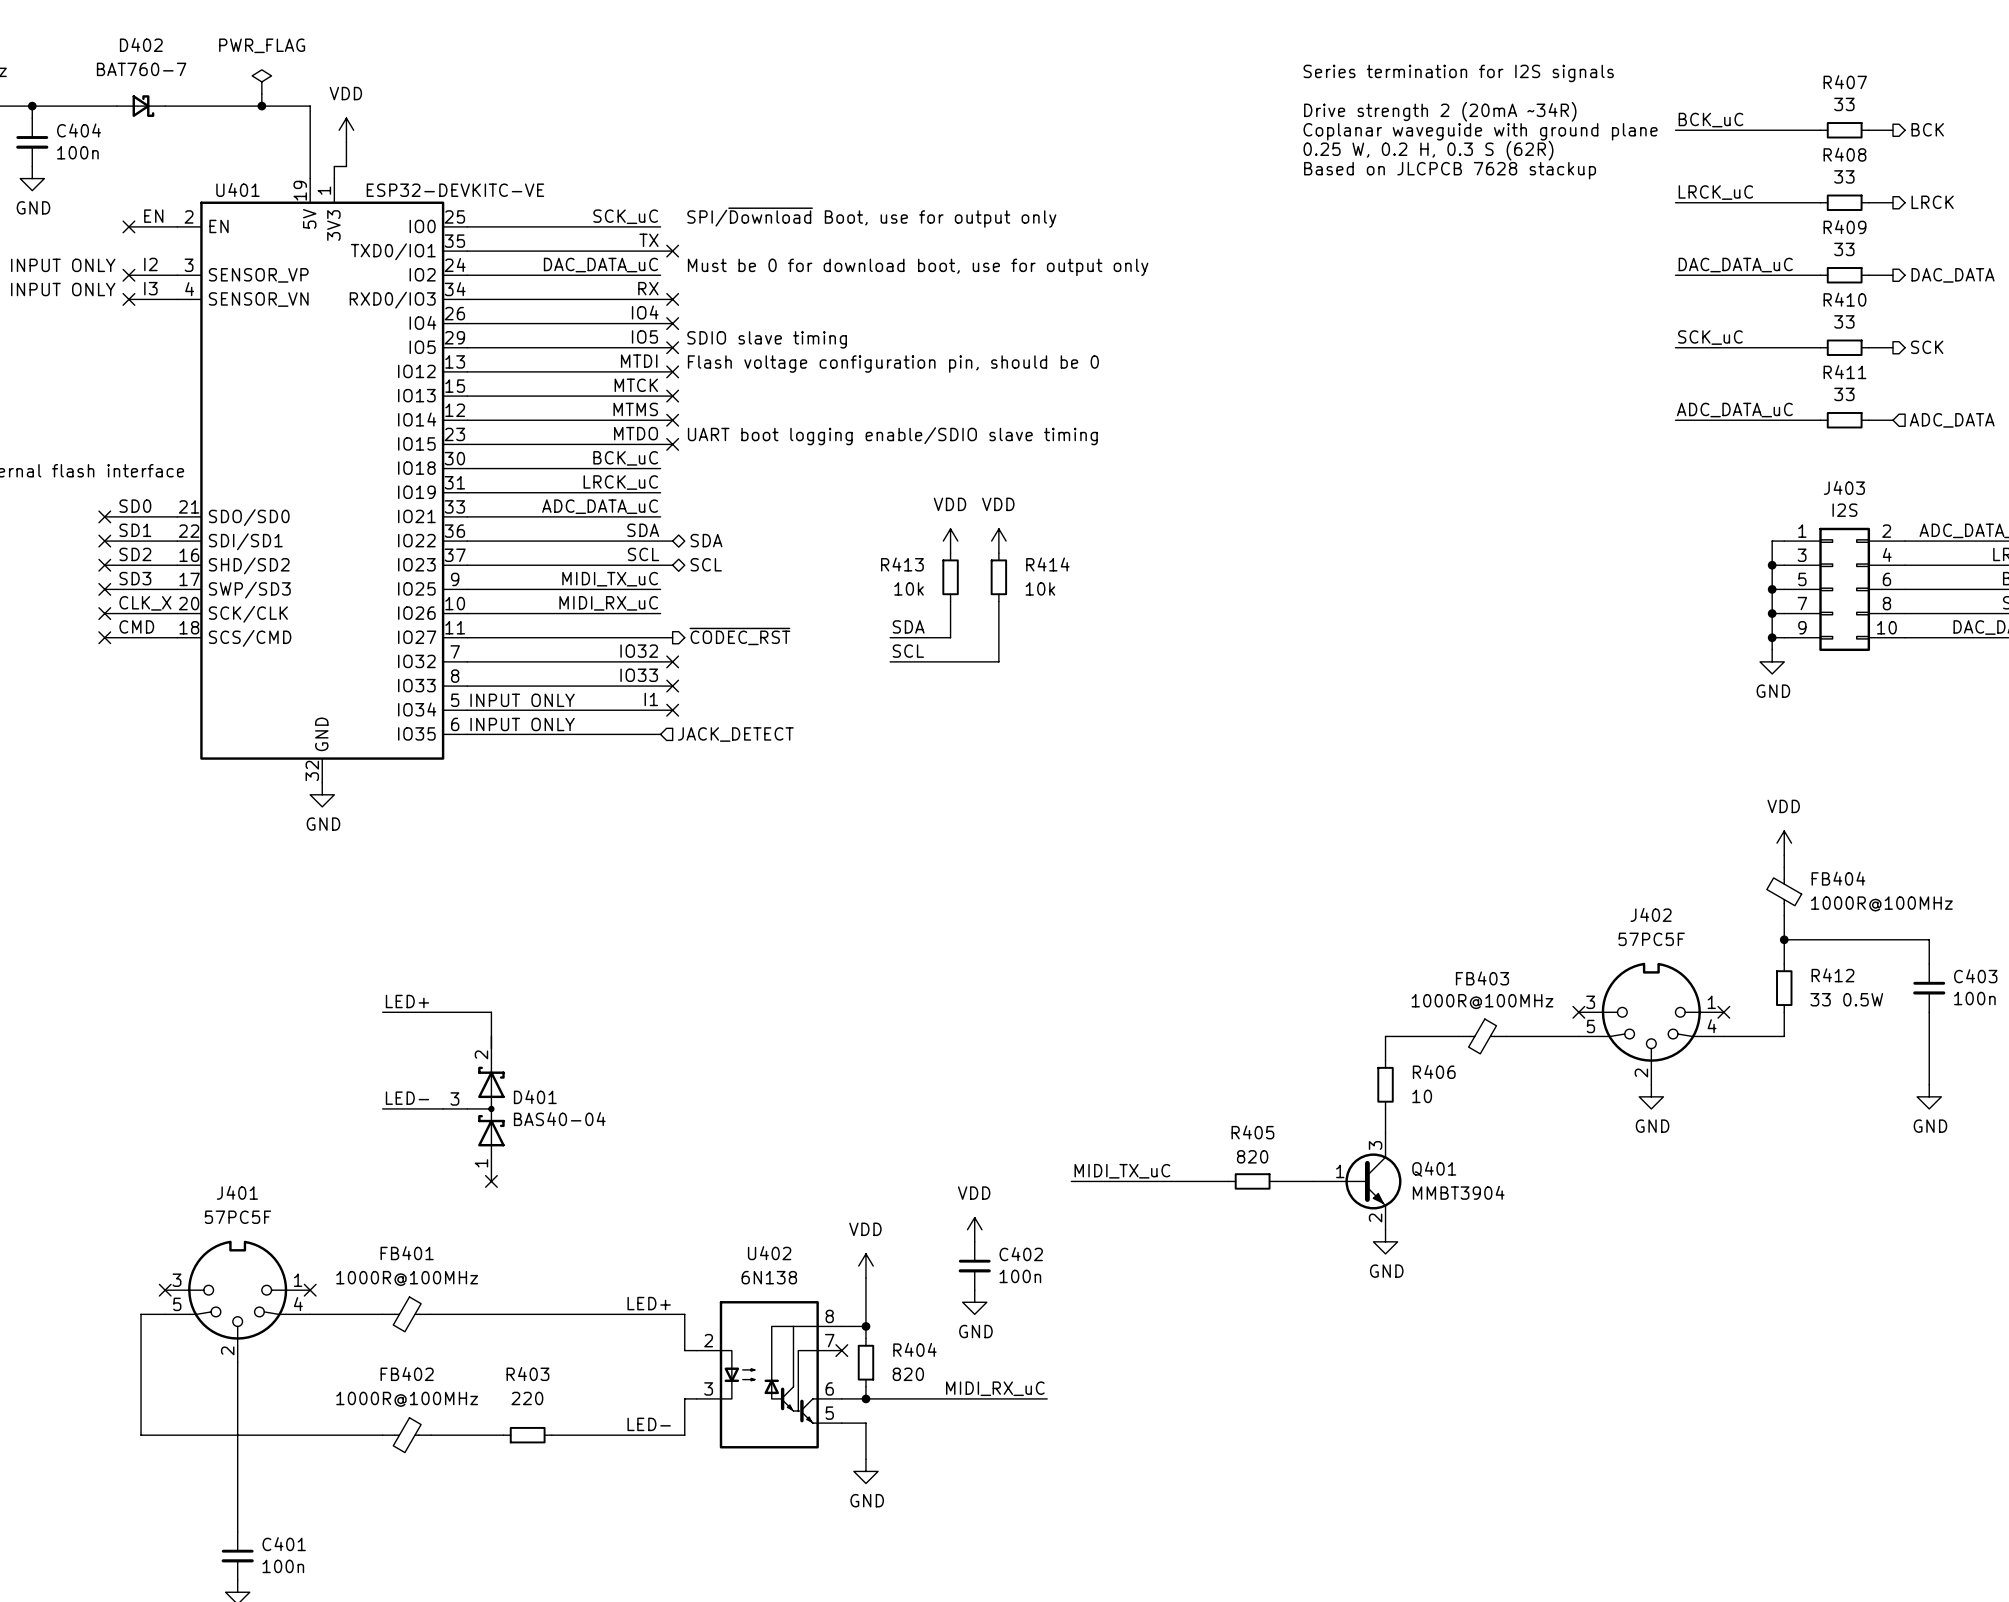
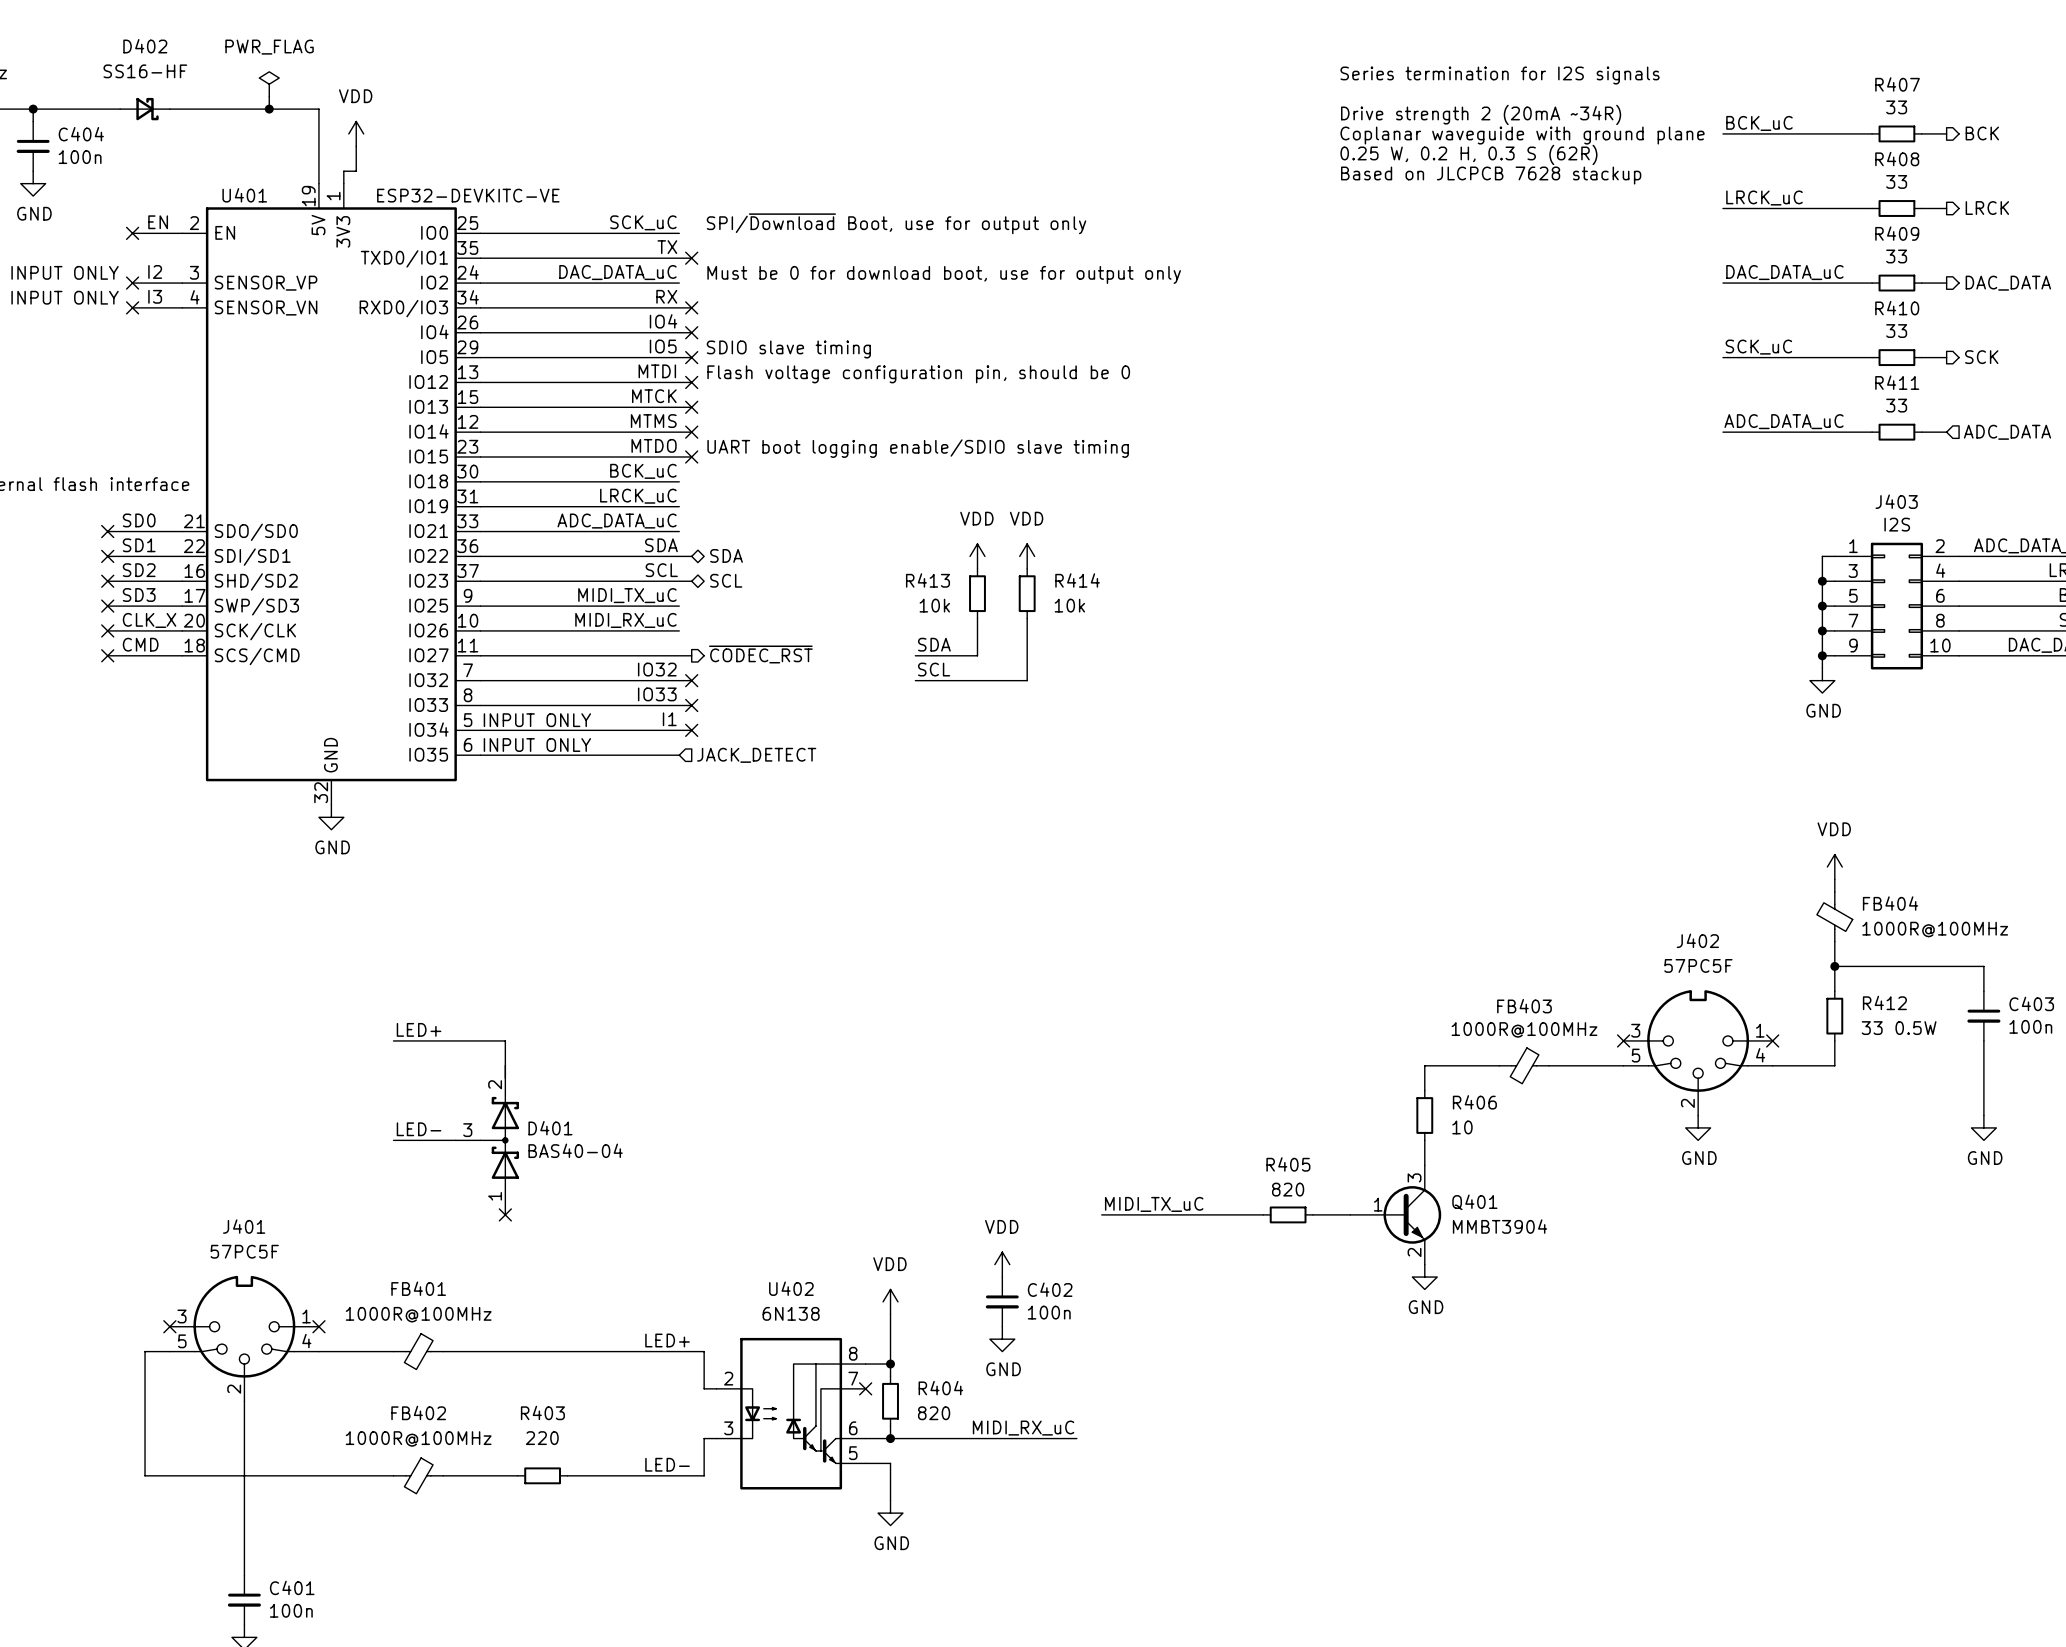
D402 value: BAT760-7 (141, 69) -> SS16-HF (145, 71)

